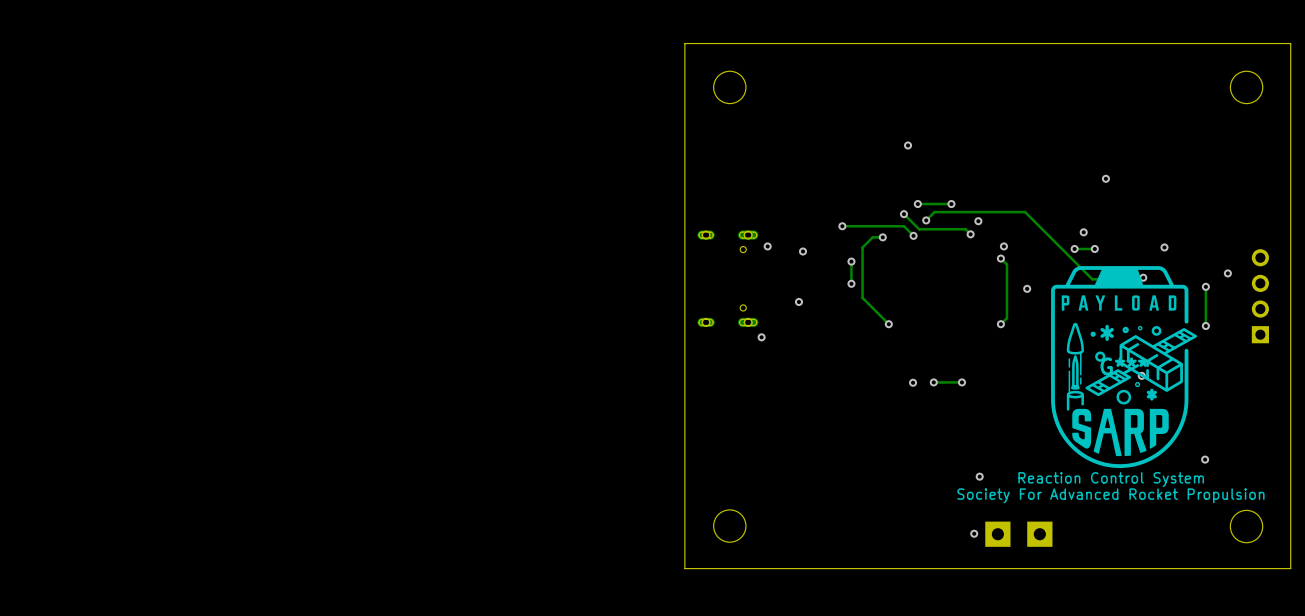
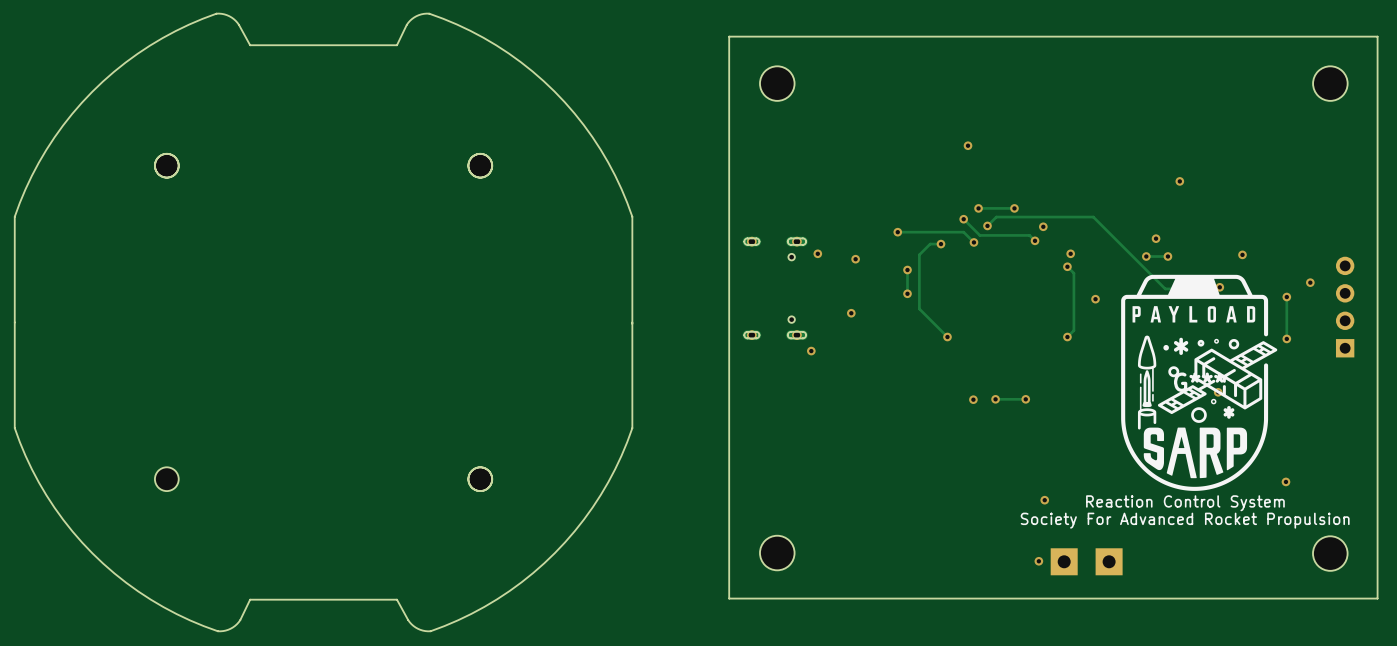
board edge: none -> (429, 13) (483, 37) (532, 71) (554, 91) (583, 125) (615, 175) (632, 216) (632, 428) (608, 482) (574, 531) (533, 573) (497, 599) (471, 613) (427, 631) (417, 628) (411, 624) (396, 599) (250, 599) (237, 624) (228, 629) (217, 631) (176, 614) (150, 599) (103, 563) (63, 519) (31, 469) (14, 428) (14, 216) (31, 175) (46, 149) (81, 102) (125, 62) (175, 31) (219, 13) (229, 16) (235, 20) (250, 45) (396, 45) (410, 20) (418, 15) (429, 13)
part: none -> (166, 165)
part: none -> (480, 165)
part: none -> (166, 479)
part: none -> (480, 479)

